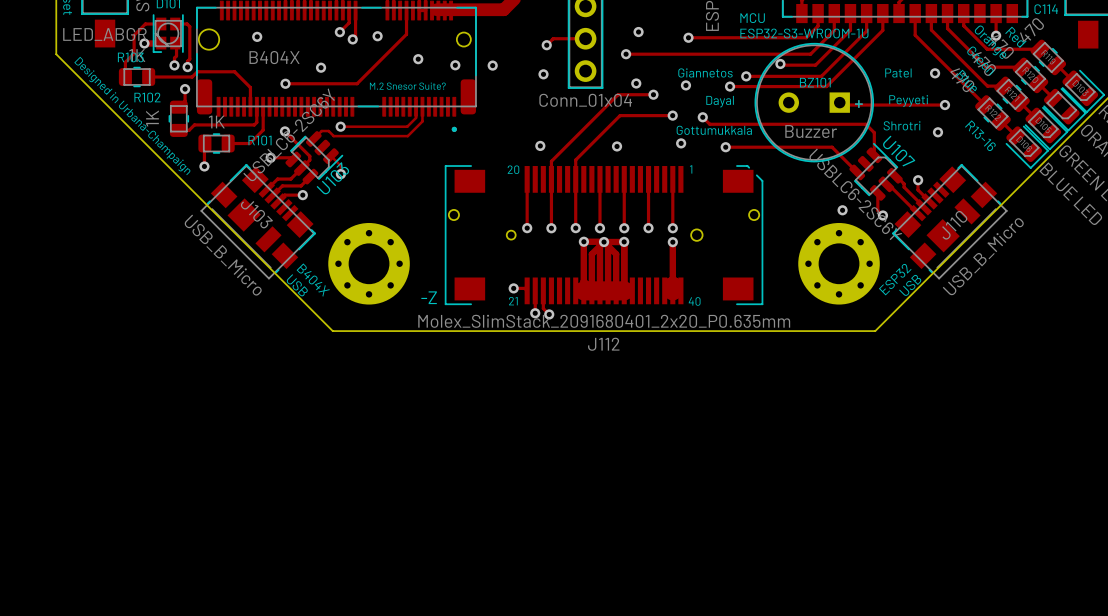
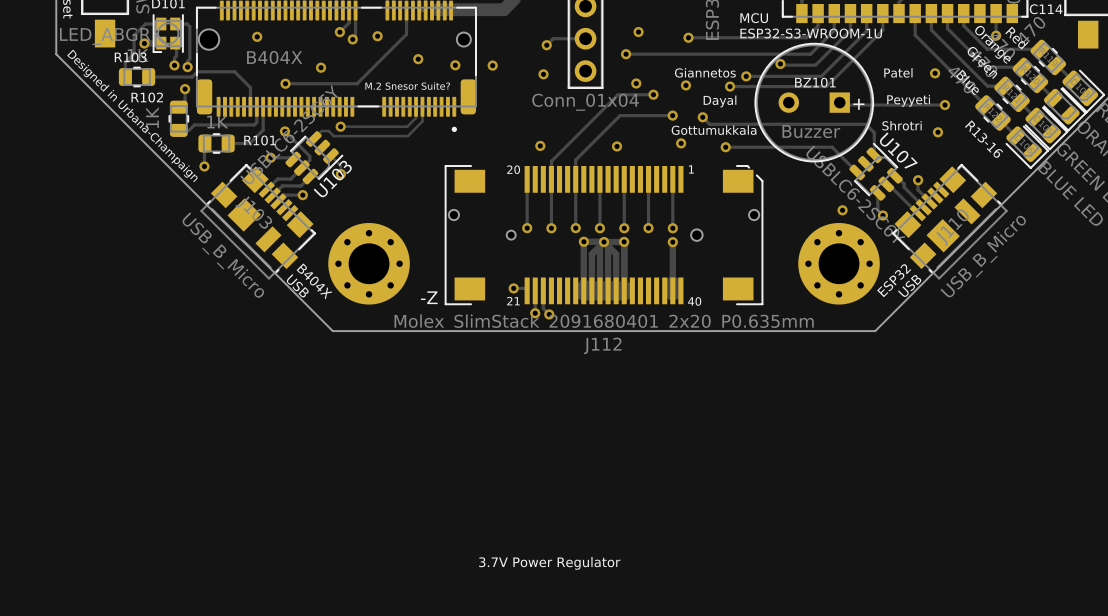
text: none -> 3.7V Power Regulator (549, 563)

